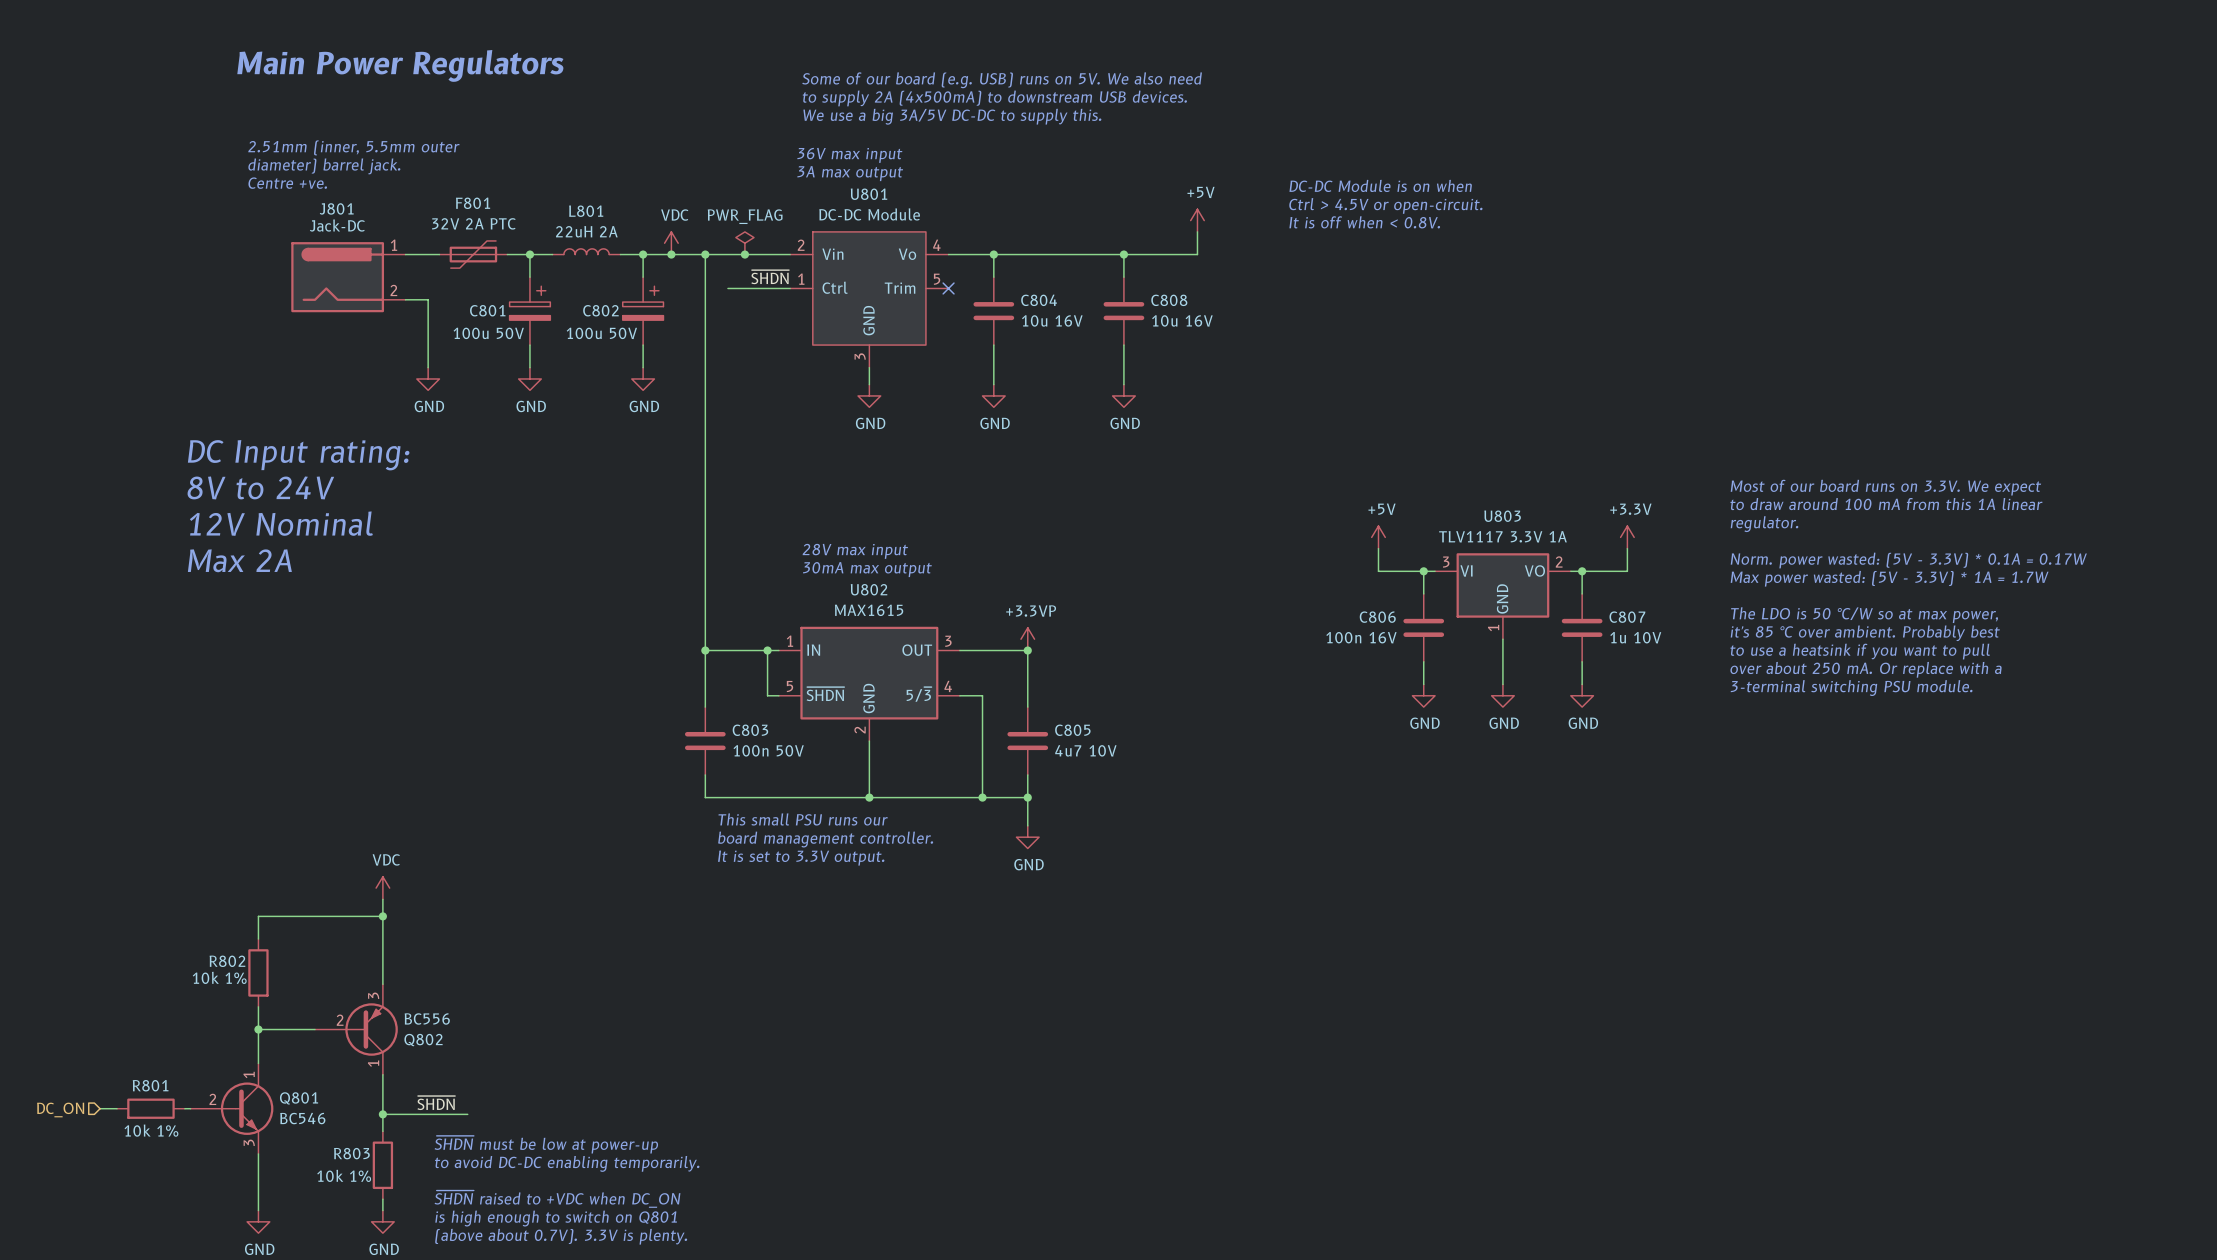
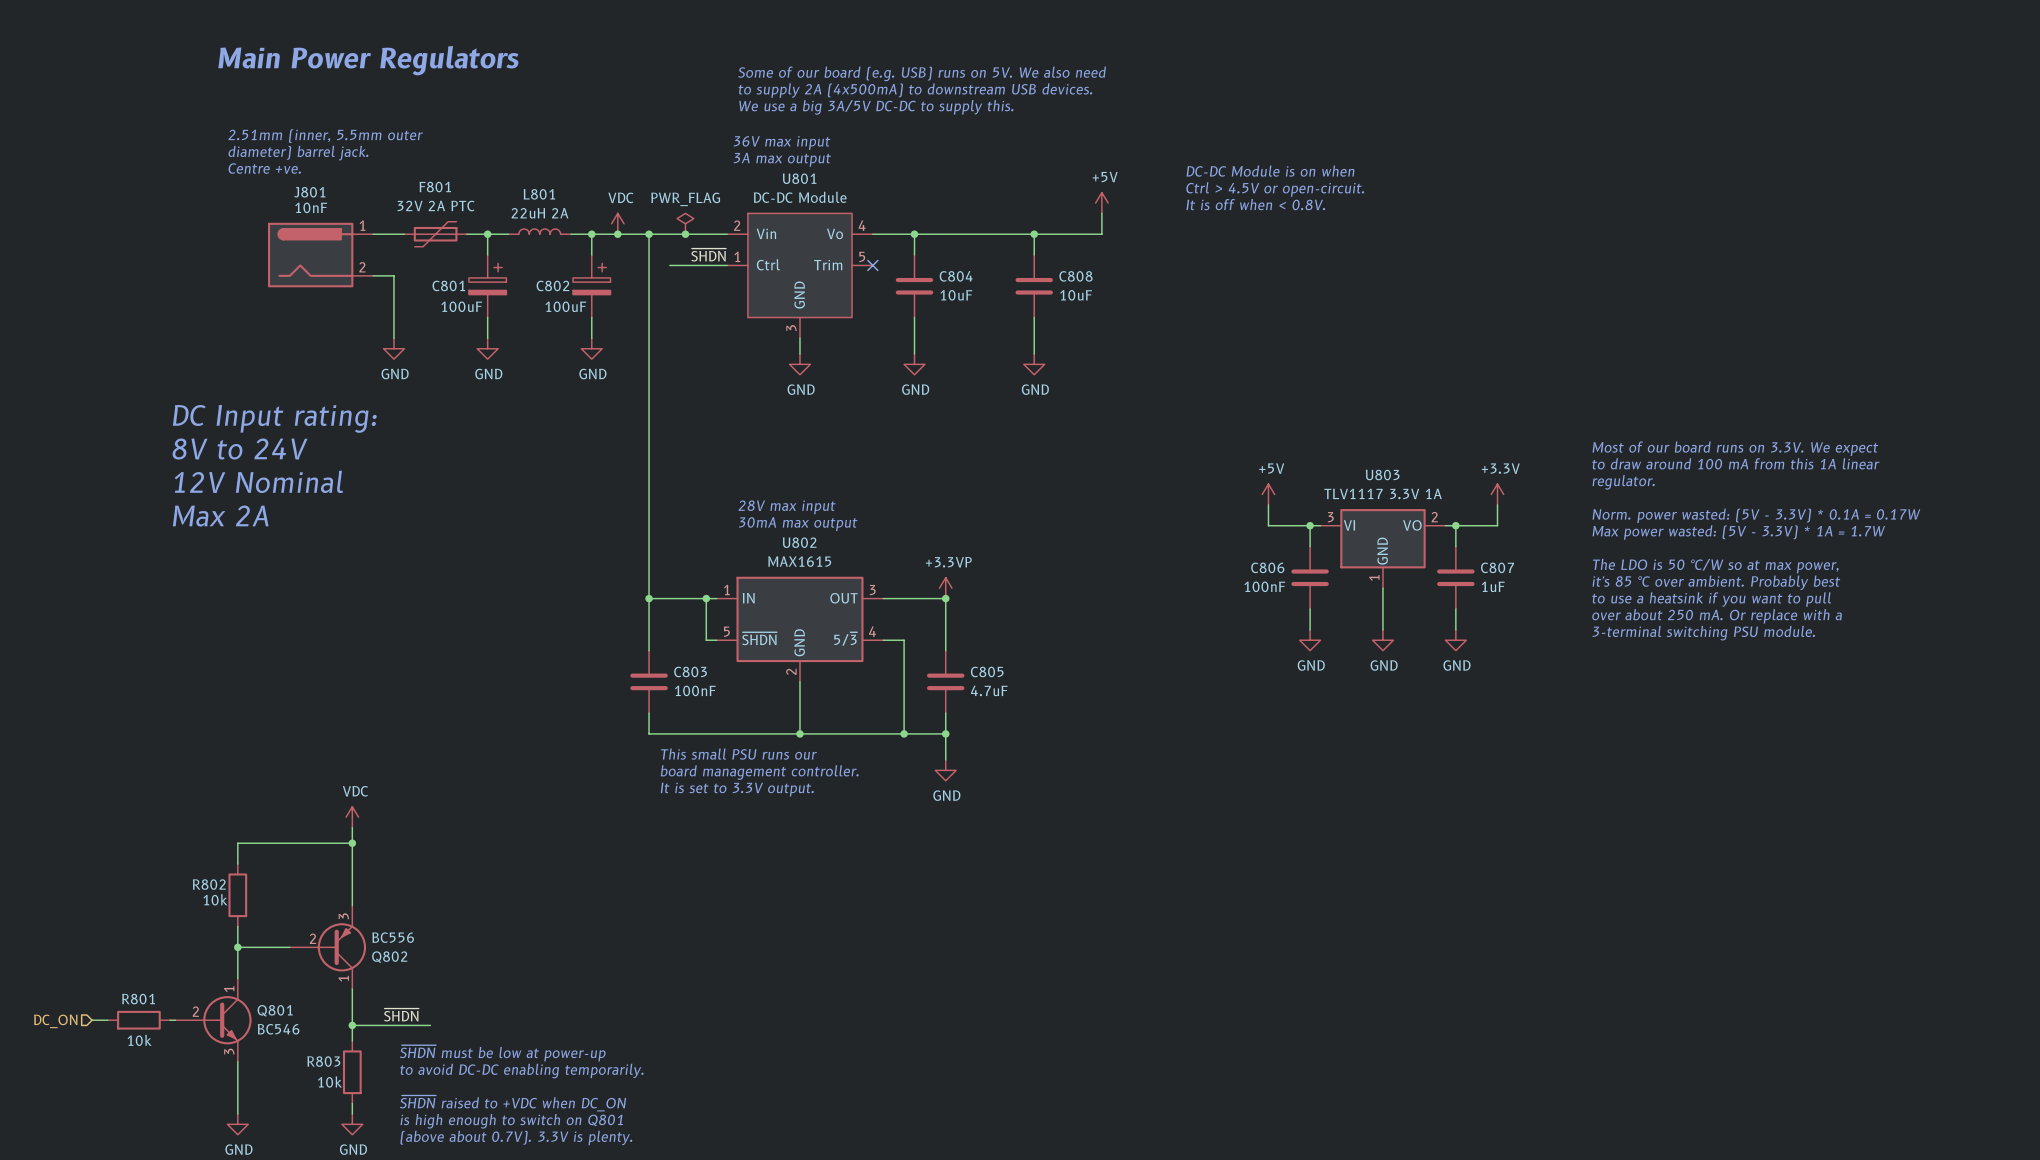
J801 value: Jack-DC (337, 225) -> 10nF (311, 207)
C804 value: 10u 16V (1052, 320) -> 10uF (956, 295)
C808 value: 10u 16V (1182, 320) -> 10uF (1076, 295)
C801 value: 100u 50V (488, 333) -> 100uF (461, 306)
C802 value: 100u 50V (601, 333) -> 100uF (565, 306)
C806 value: 100n 16V (1361, 637) -> 100nF (1264, 586)
C807 value: 1u 10V (1635, 637) -> 1uF (1493, 586)
C803 value: 100n 50V (768, 750) -> 100nF (695, 690)
C805 value: 4u7 10V (1085, 750) -> 4.7uF (989, 690)
R802 value: 10k 1% (219, 977) -> 10k (215, 899)
R801 value: 10k 1% (151, 1130) -> 10k (139, 1040)
R803 value: 10k 1% (344, 1175) -> 10k (329, 1082)

